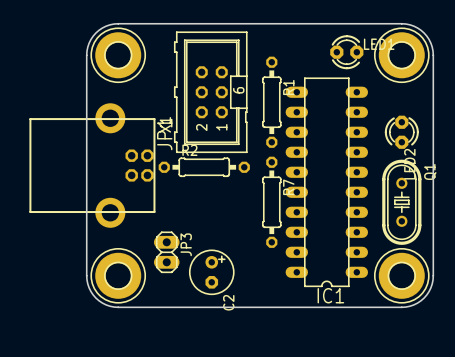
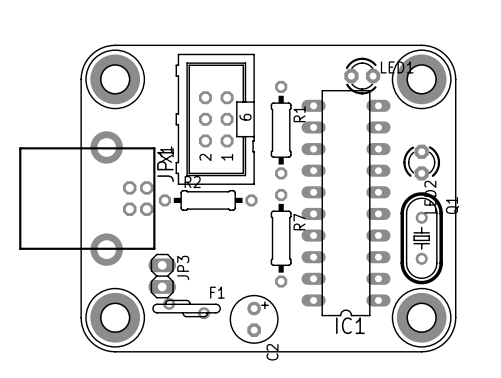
IC1 position: (326, 182) -> (346, 203)
JP3 position: (166, 252) -> (162, 276)
F1: none -> (186, 308)
C2 position: (211, 272) -> (254, 319)

